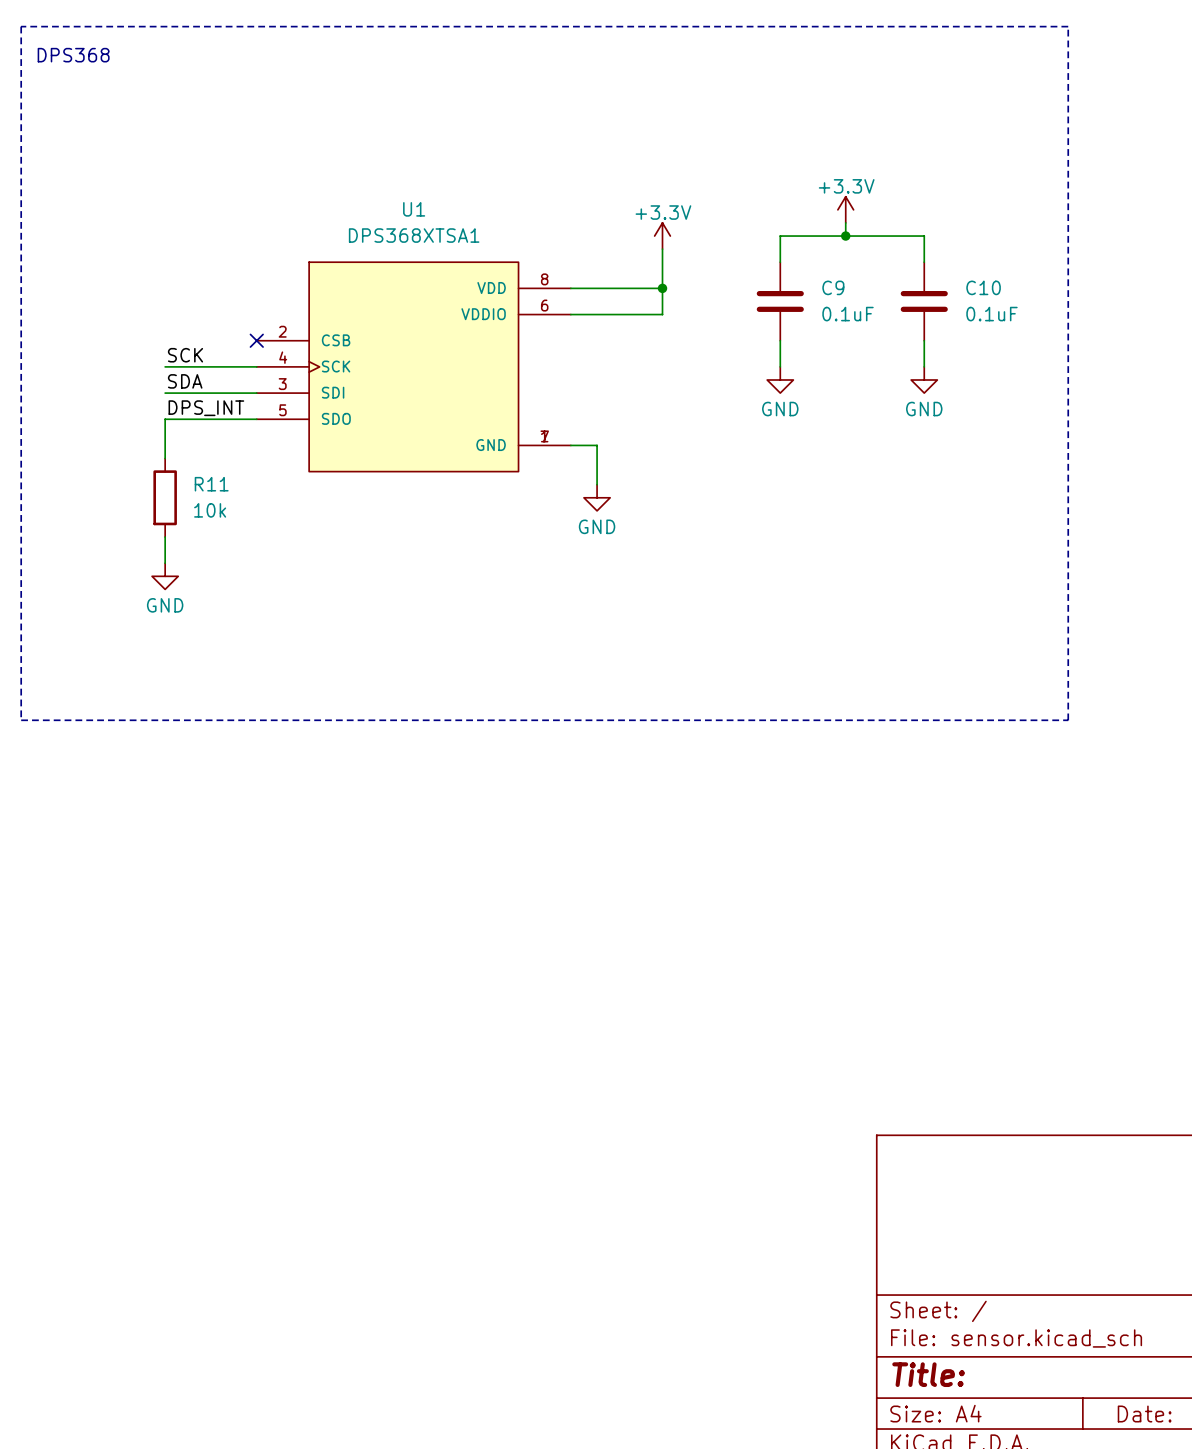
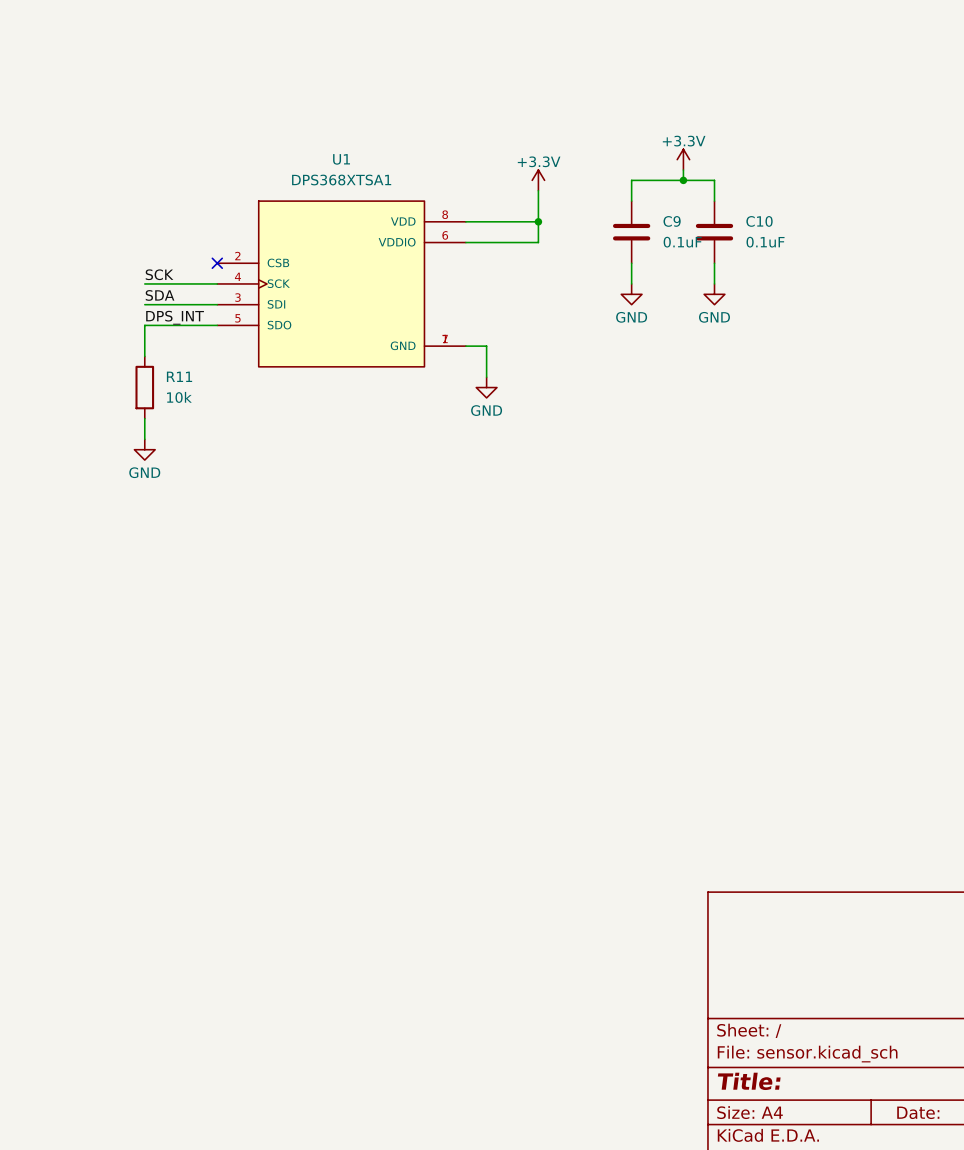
line: (21, 26) (1068, 26) (1068, 720) (21, 720) (21, 26) -> none
text: DPS368 (73, 55) -> none
wire: (885, 236) (924, 236) (924, 262) -> (714, 180) (714, 201)
C10 position: (924, 301) -> (714, 232)
wire: (924, 340) (924, 366) -> (714, 263) (714, 283)
power symbol position: GND (924, 379) -> GND (714, 294)

